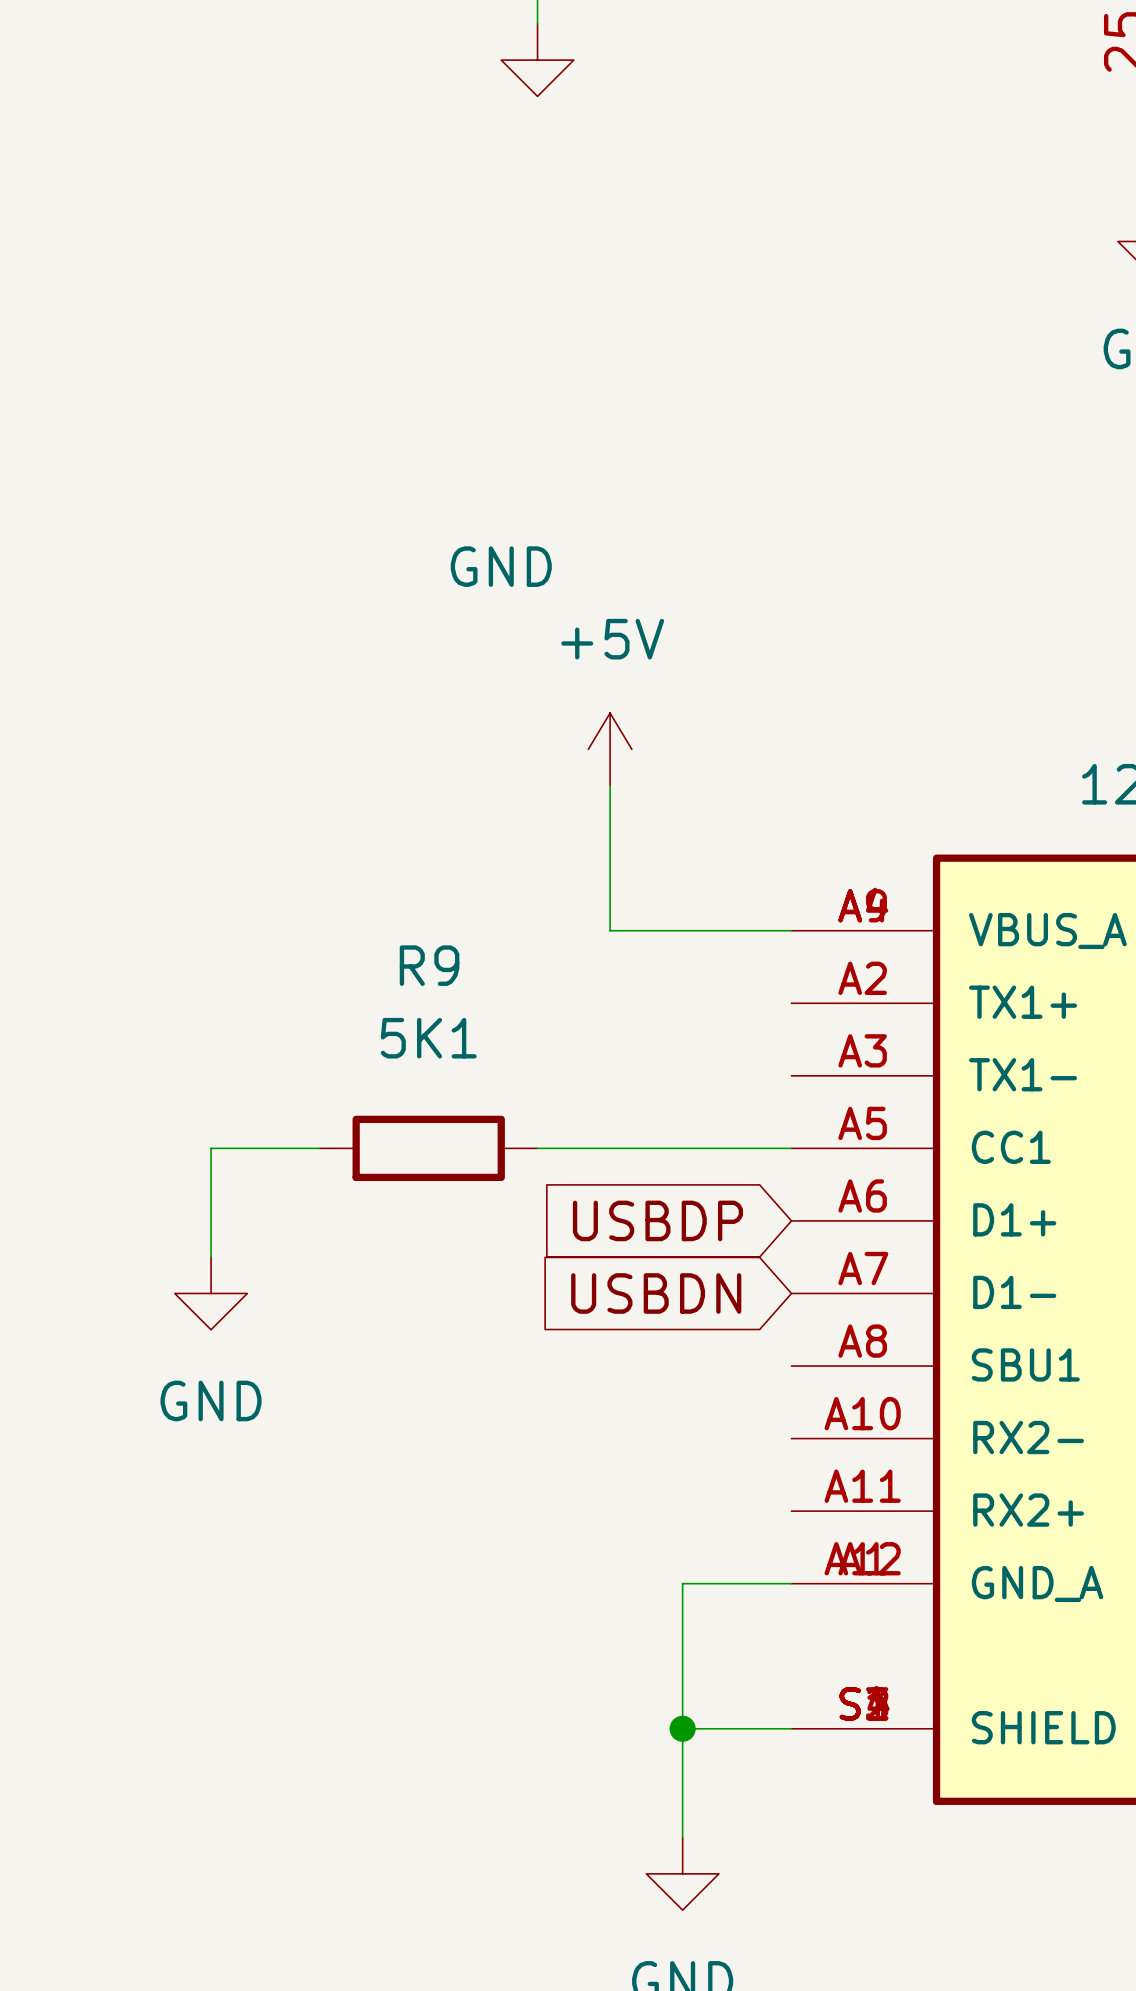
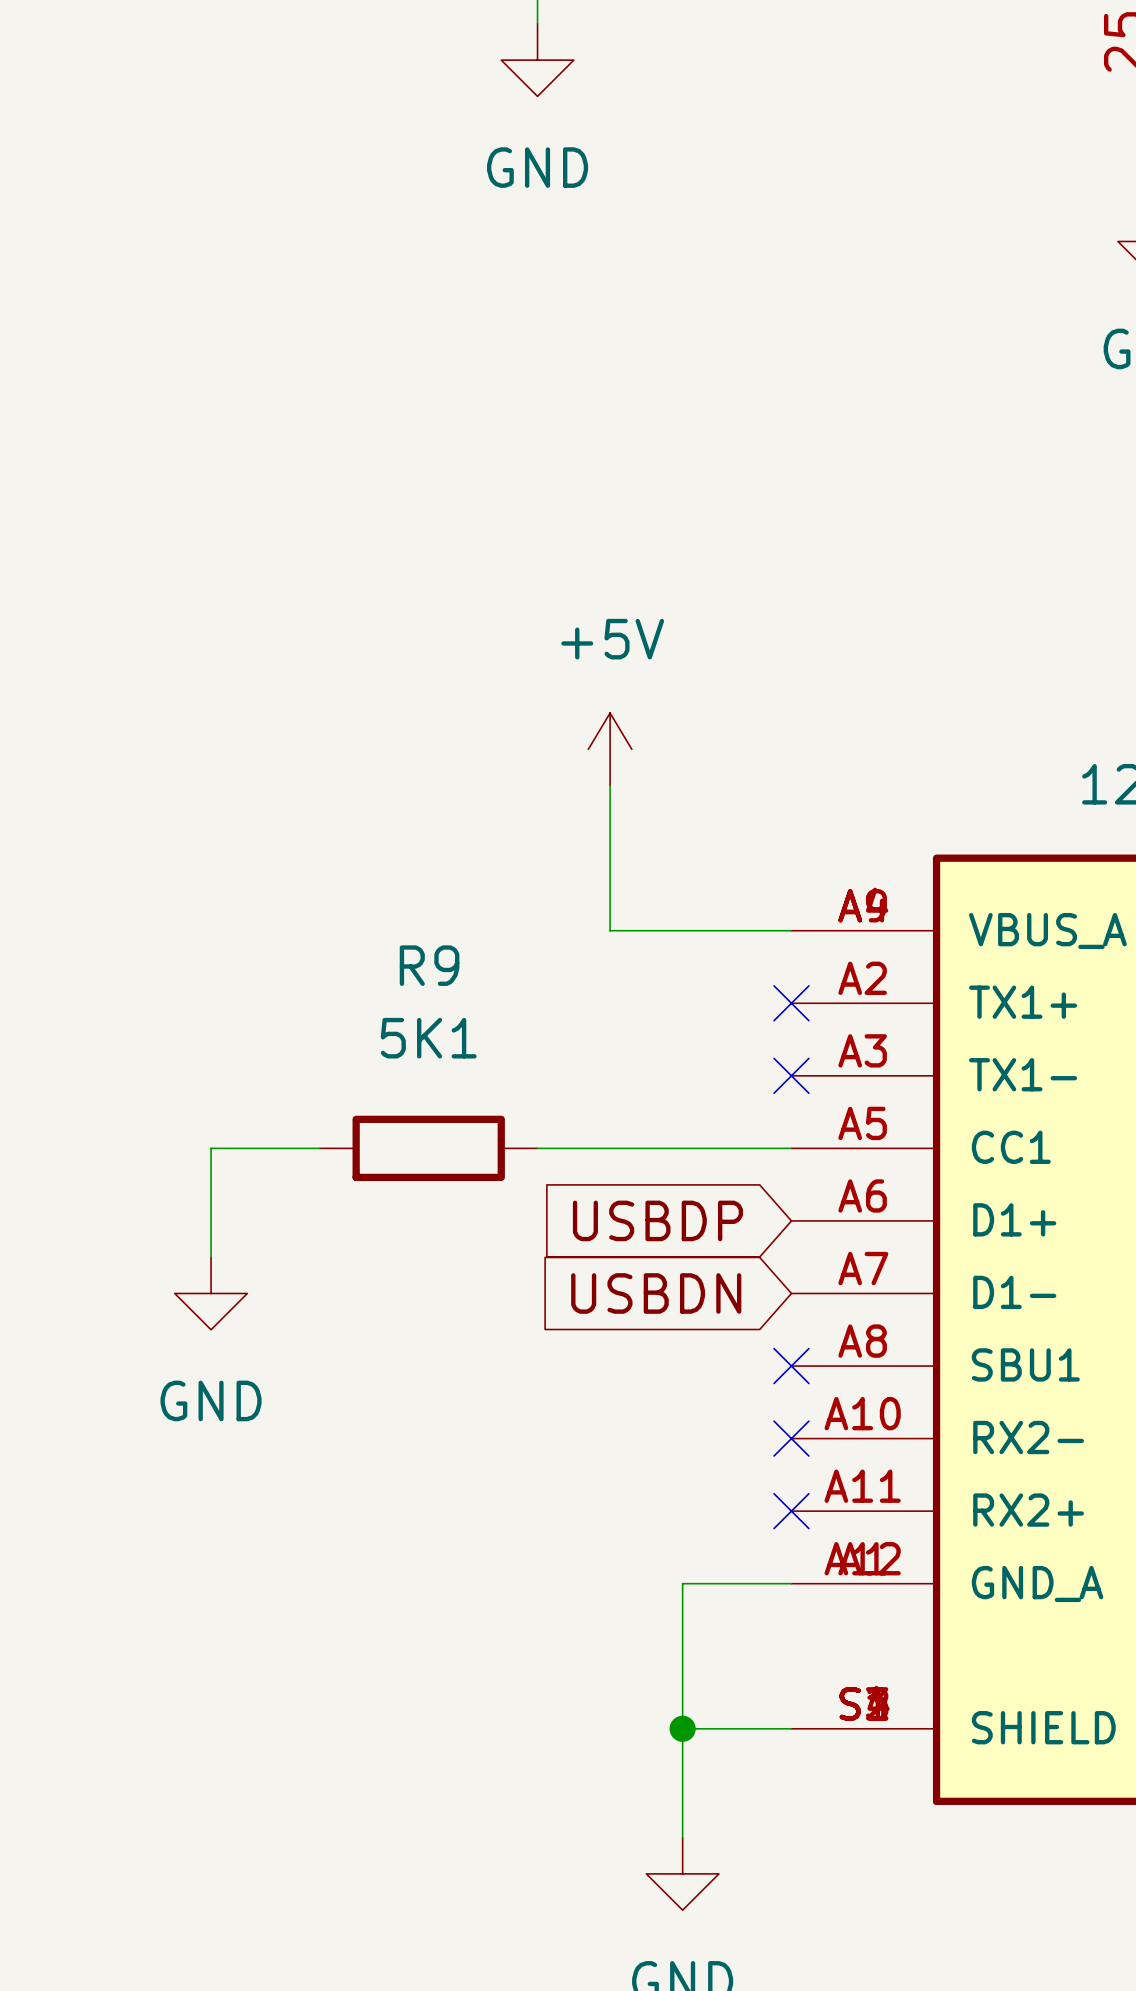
power symbol text position: GND (501, 566) -> GND (537, 167)
no-connect mark: none -> (791, 1003)
no-connect mark: none -> (791, 1075)
no-connect mark: none -> (791, 1366)
no-connect mark: none -> (791, 1438)
no-connect mark: none -> (791, 1511)

